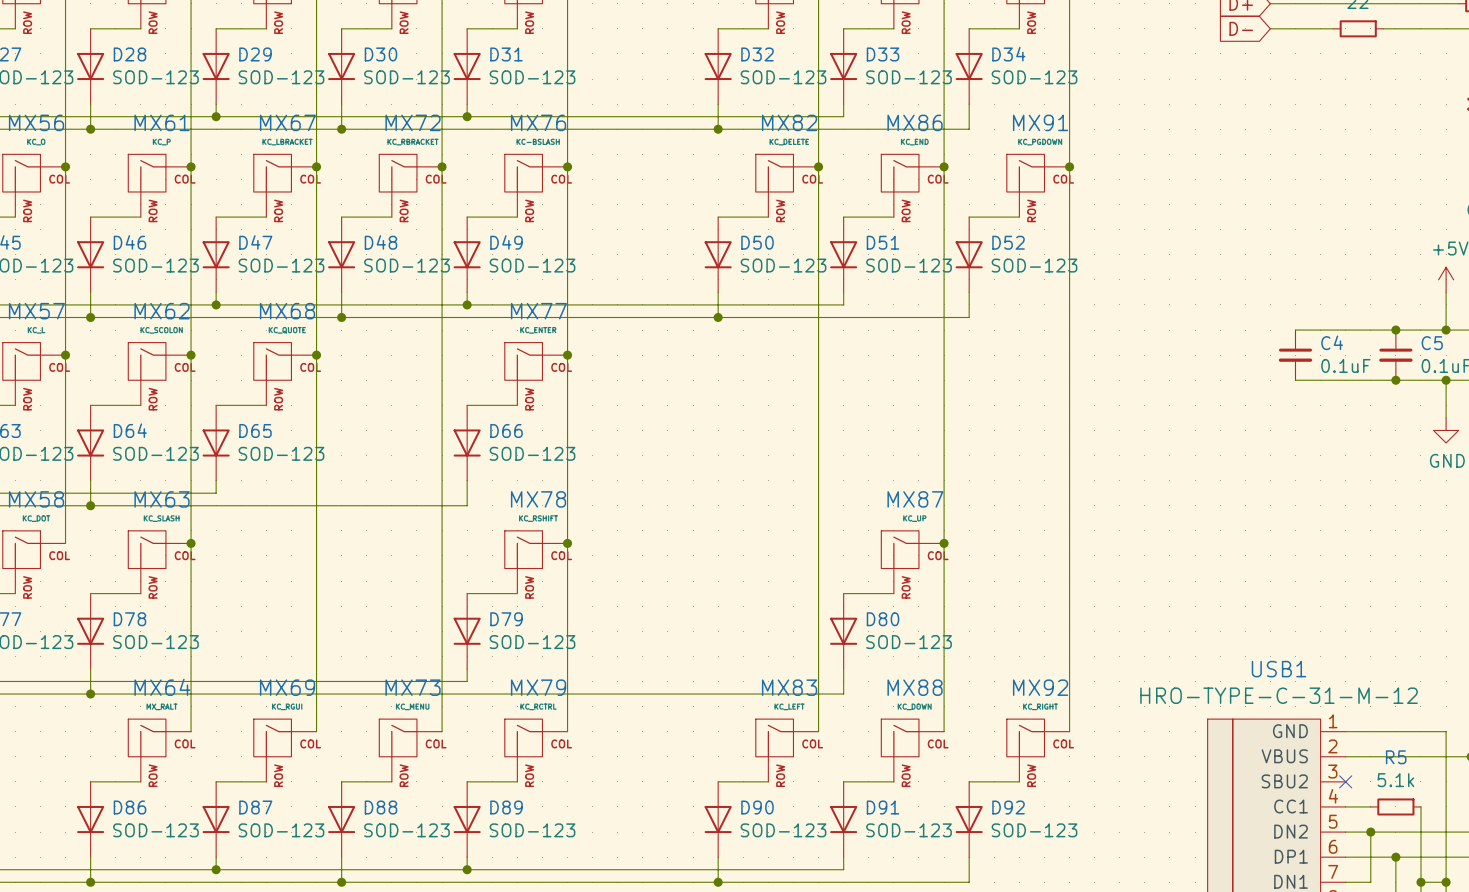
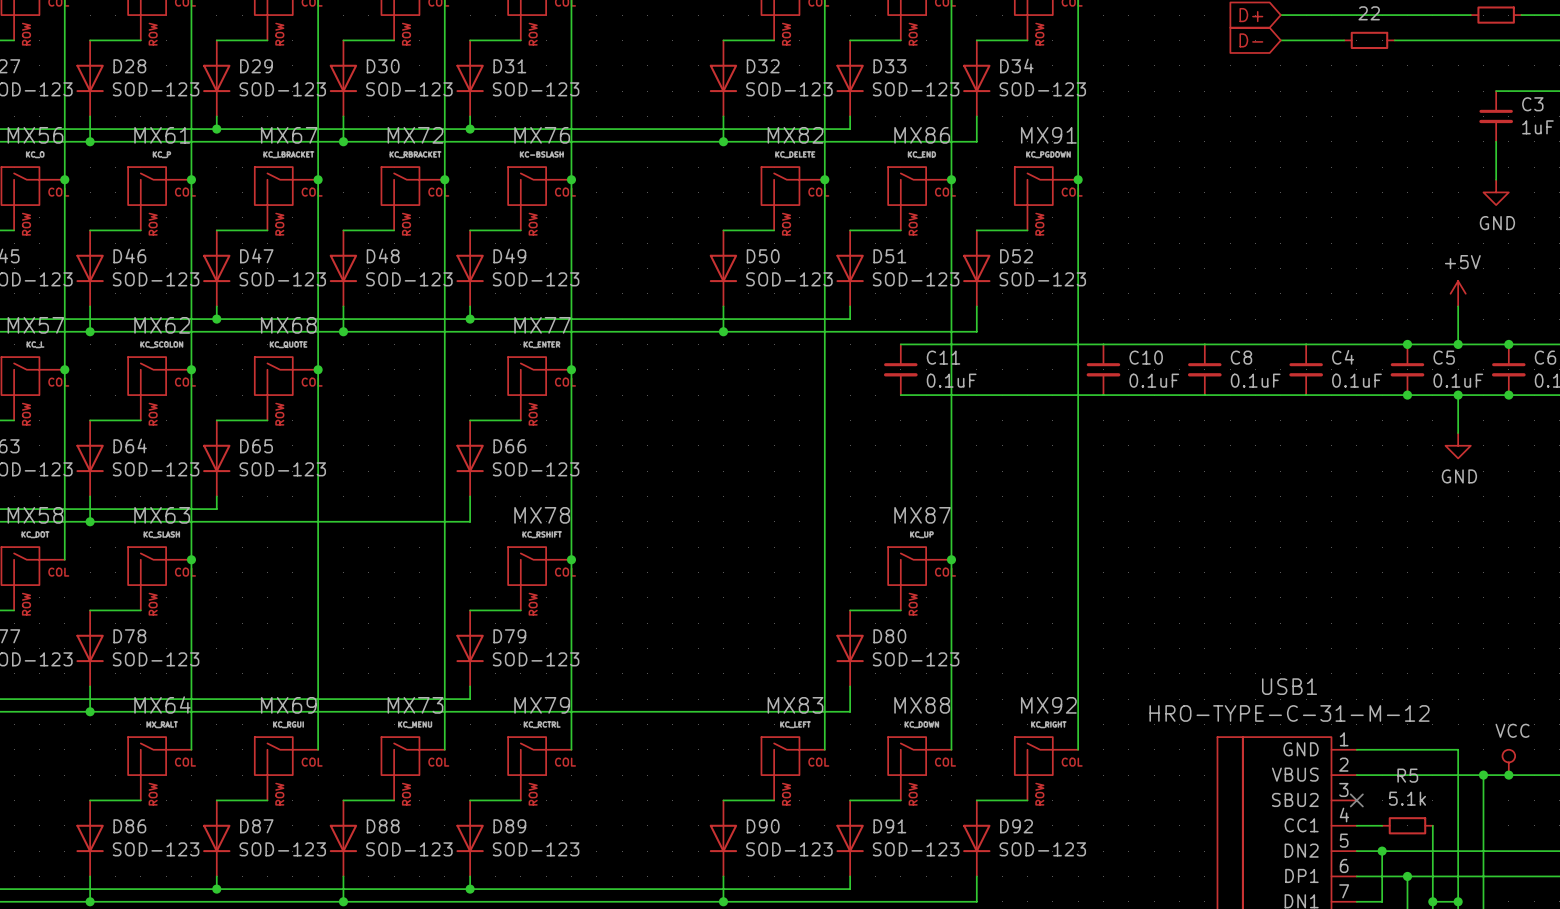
wire: none -> (900, 344) (1306, 344)
C11: none -> 0.1uF (900, 369)
C10: none -> 0.1uF (1103, 369)
C8: none -> 0.1uF (1204, 369)
wire: none -> (900, 395) (1306, 395)

